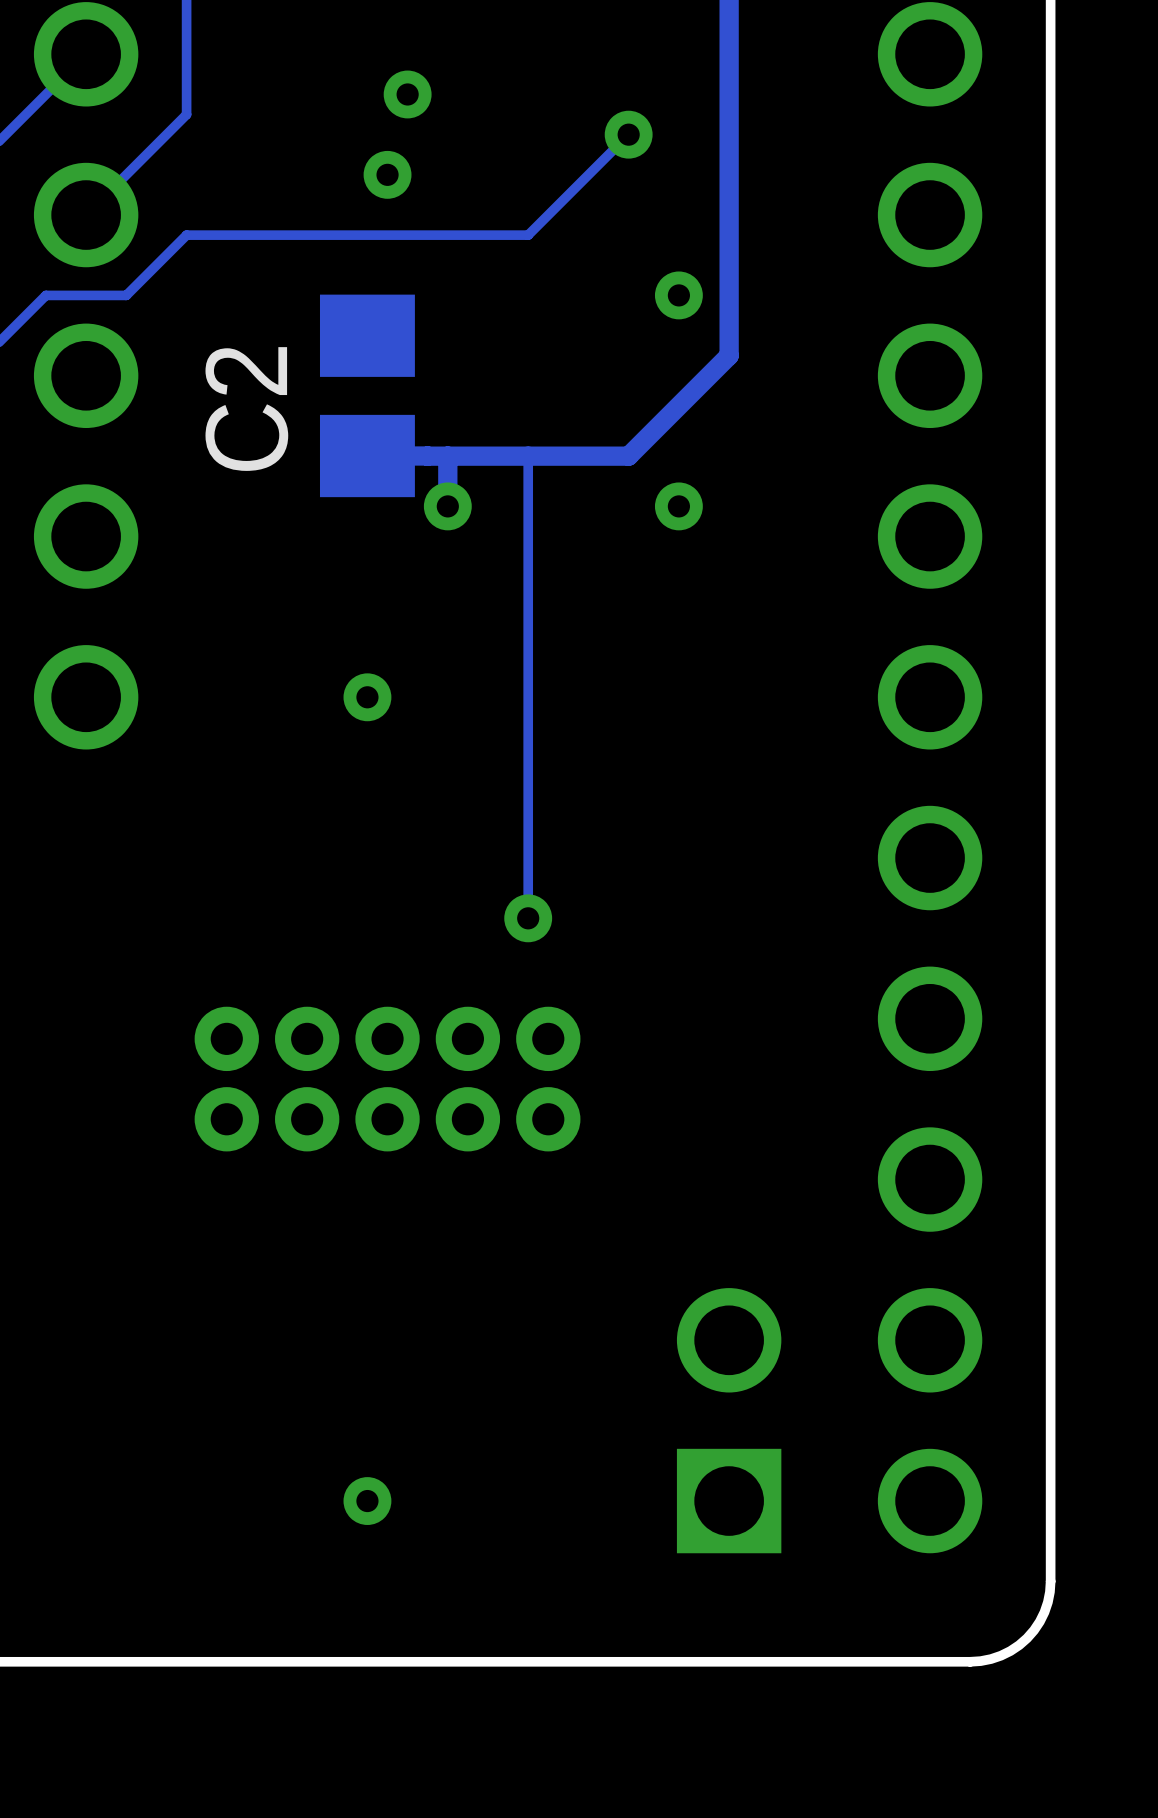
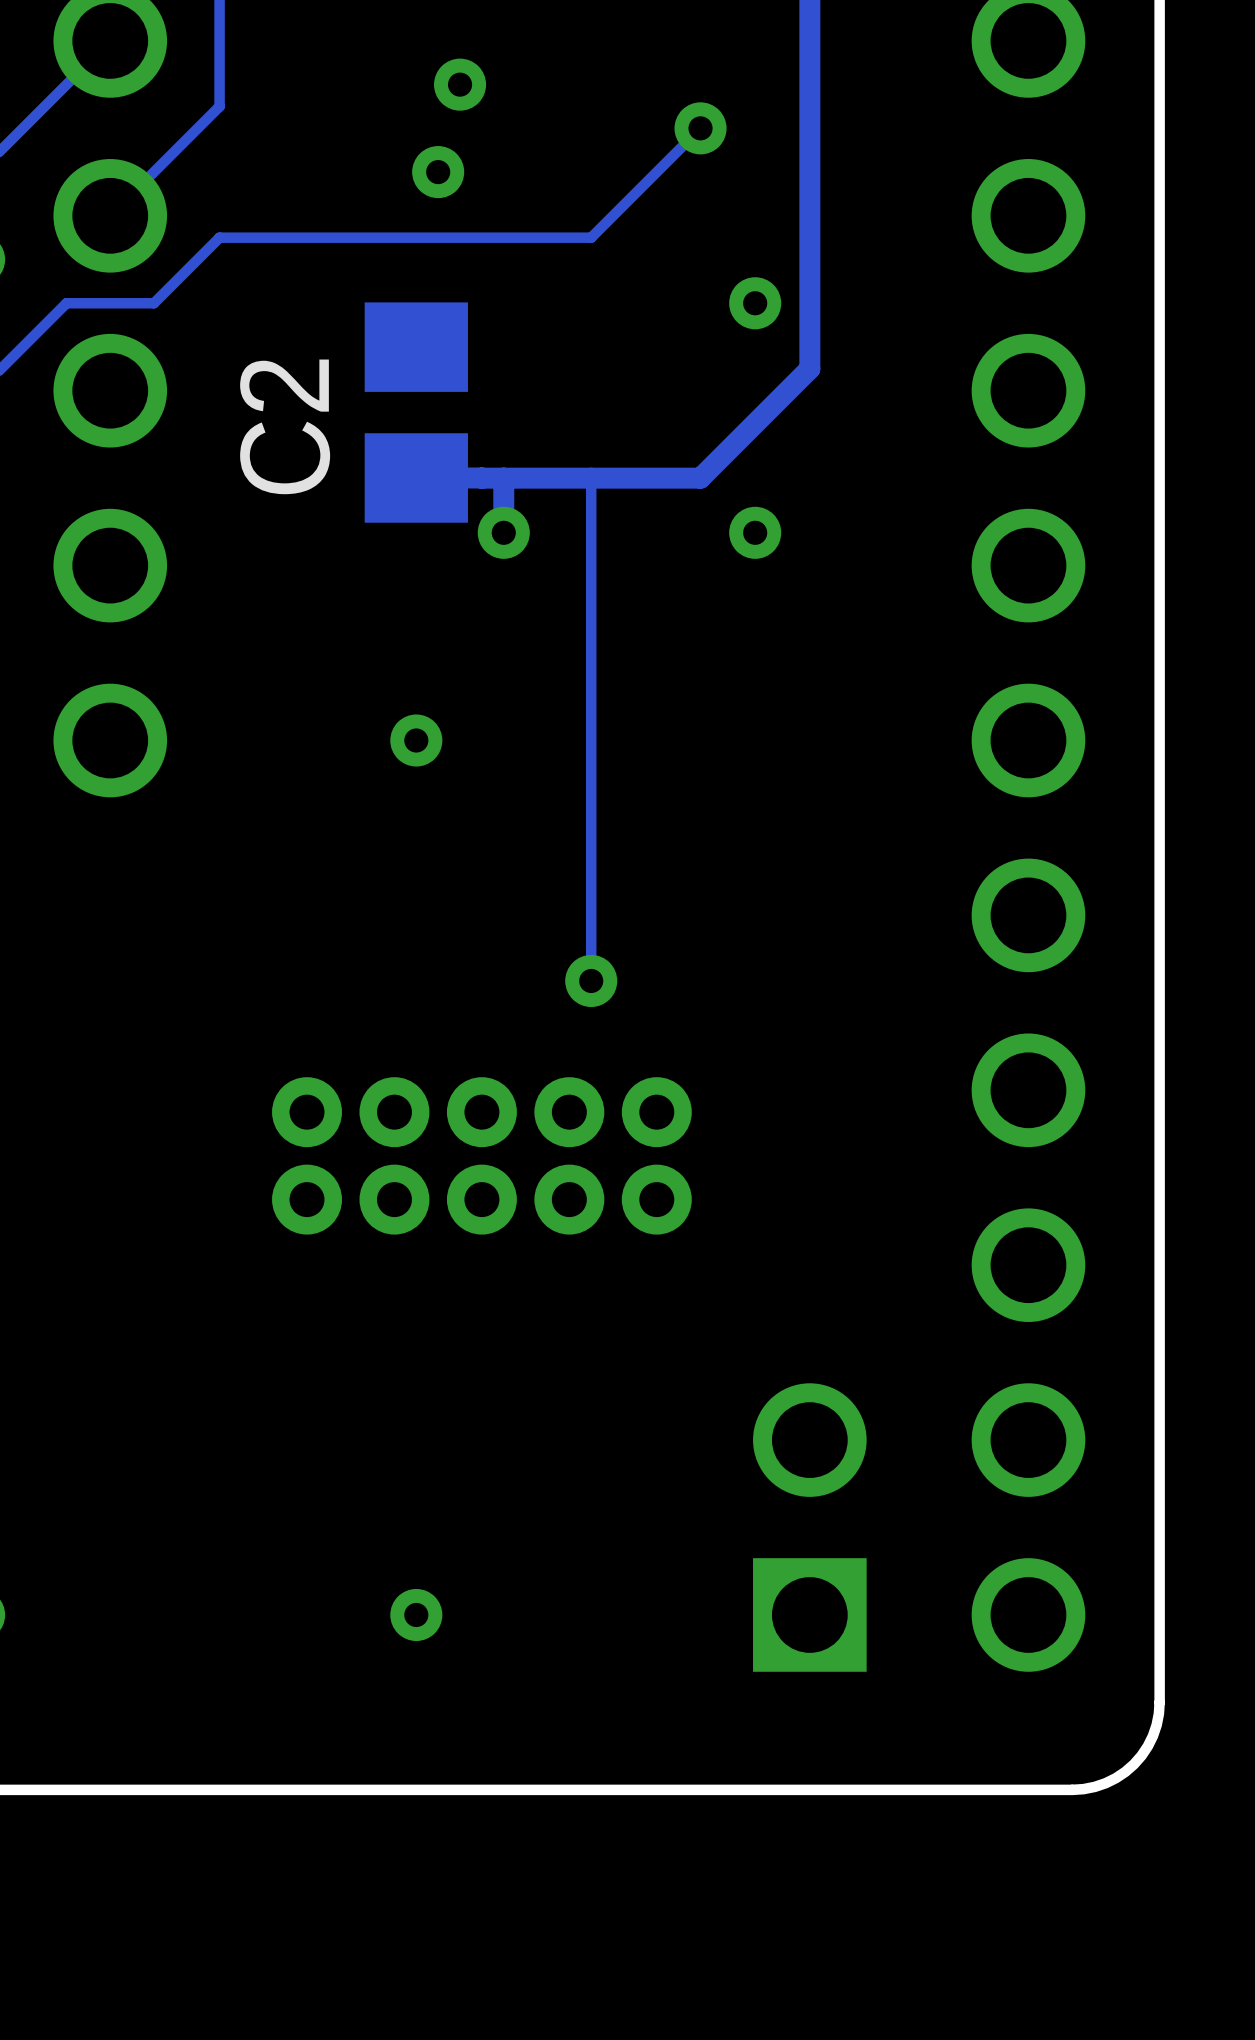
part position: (387, 1079) -> (481, 1155)

